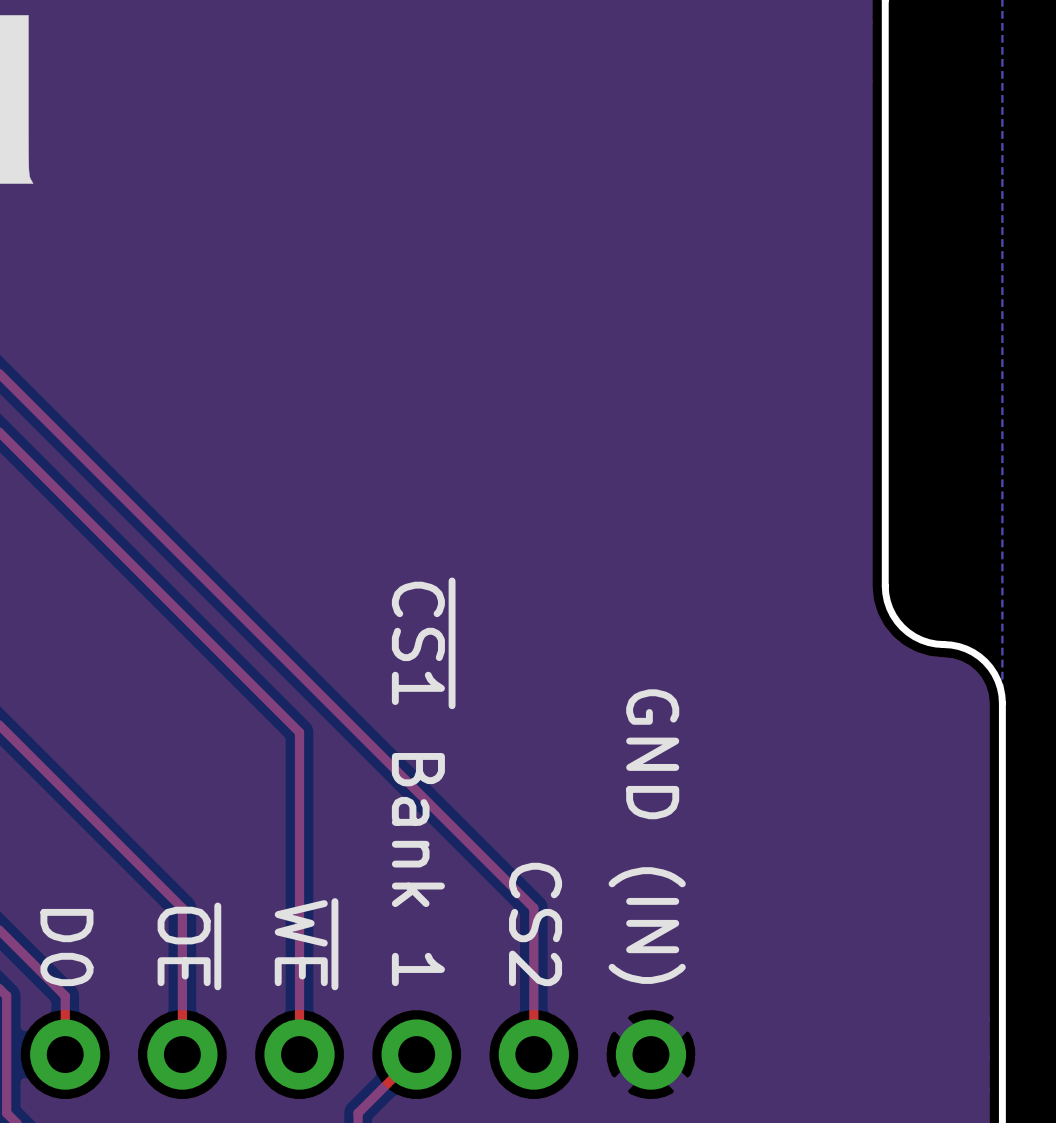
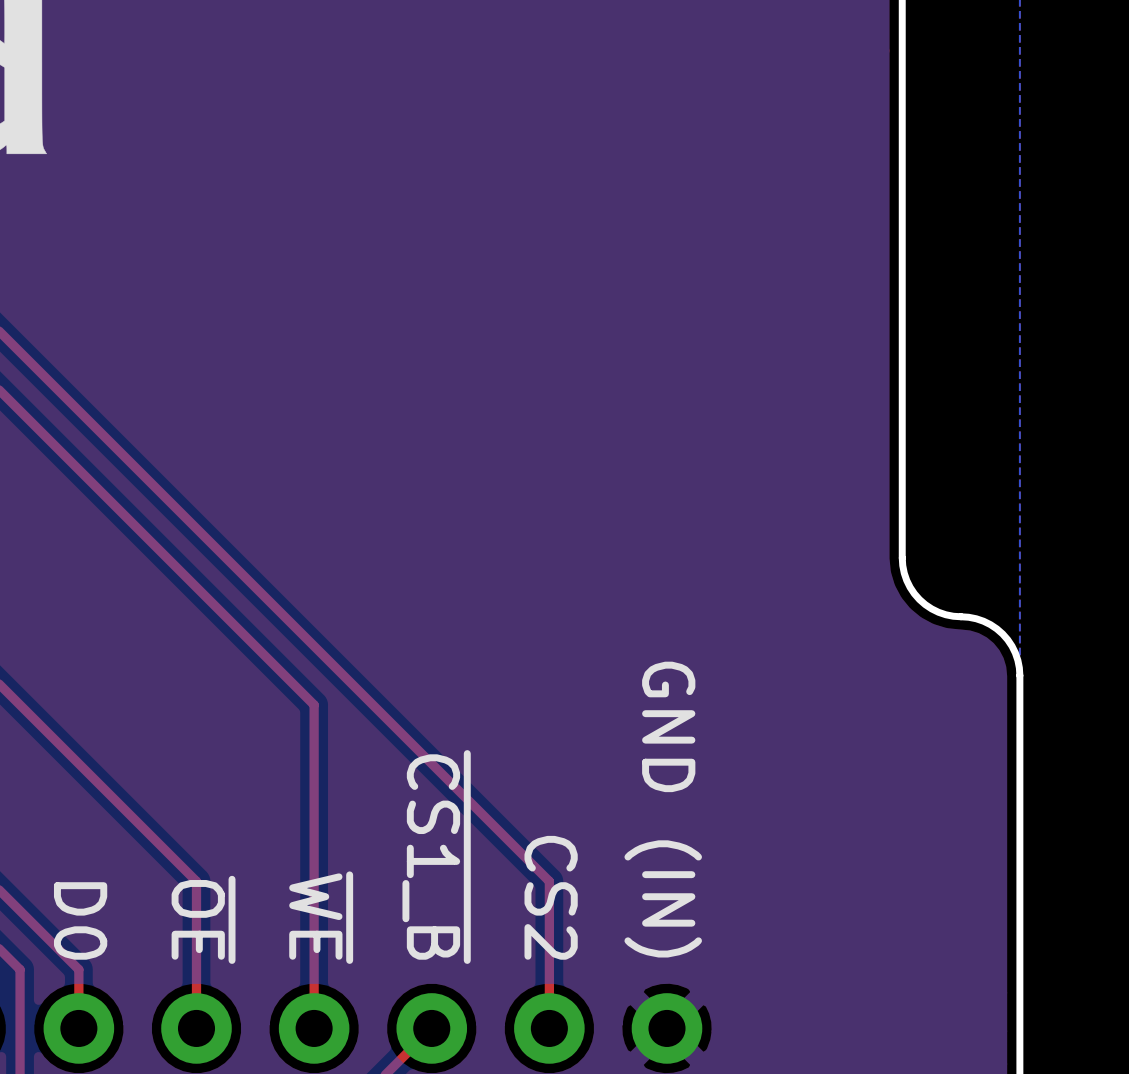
text: ~{CS1} Bank 1 (423, 781) -> ~{CS1_B} (436, 857)

